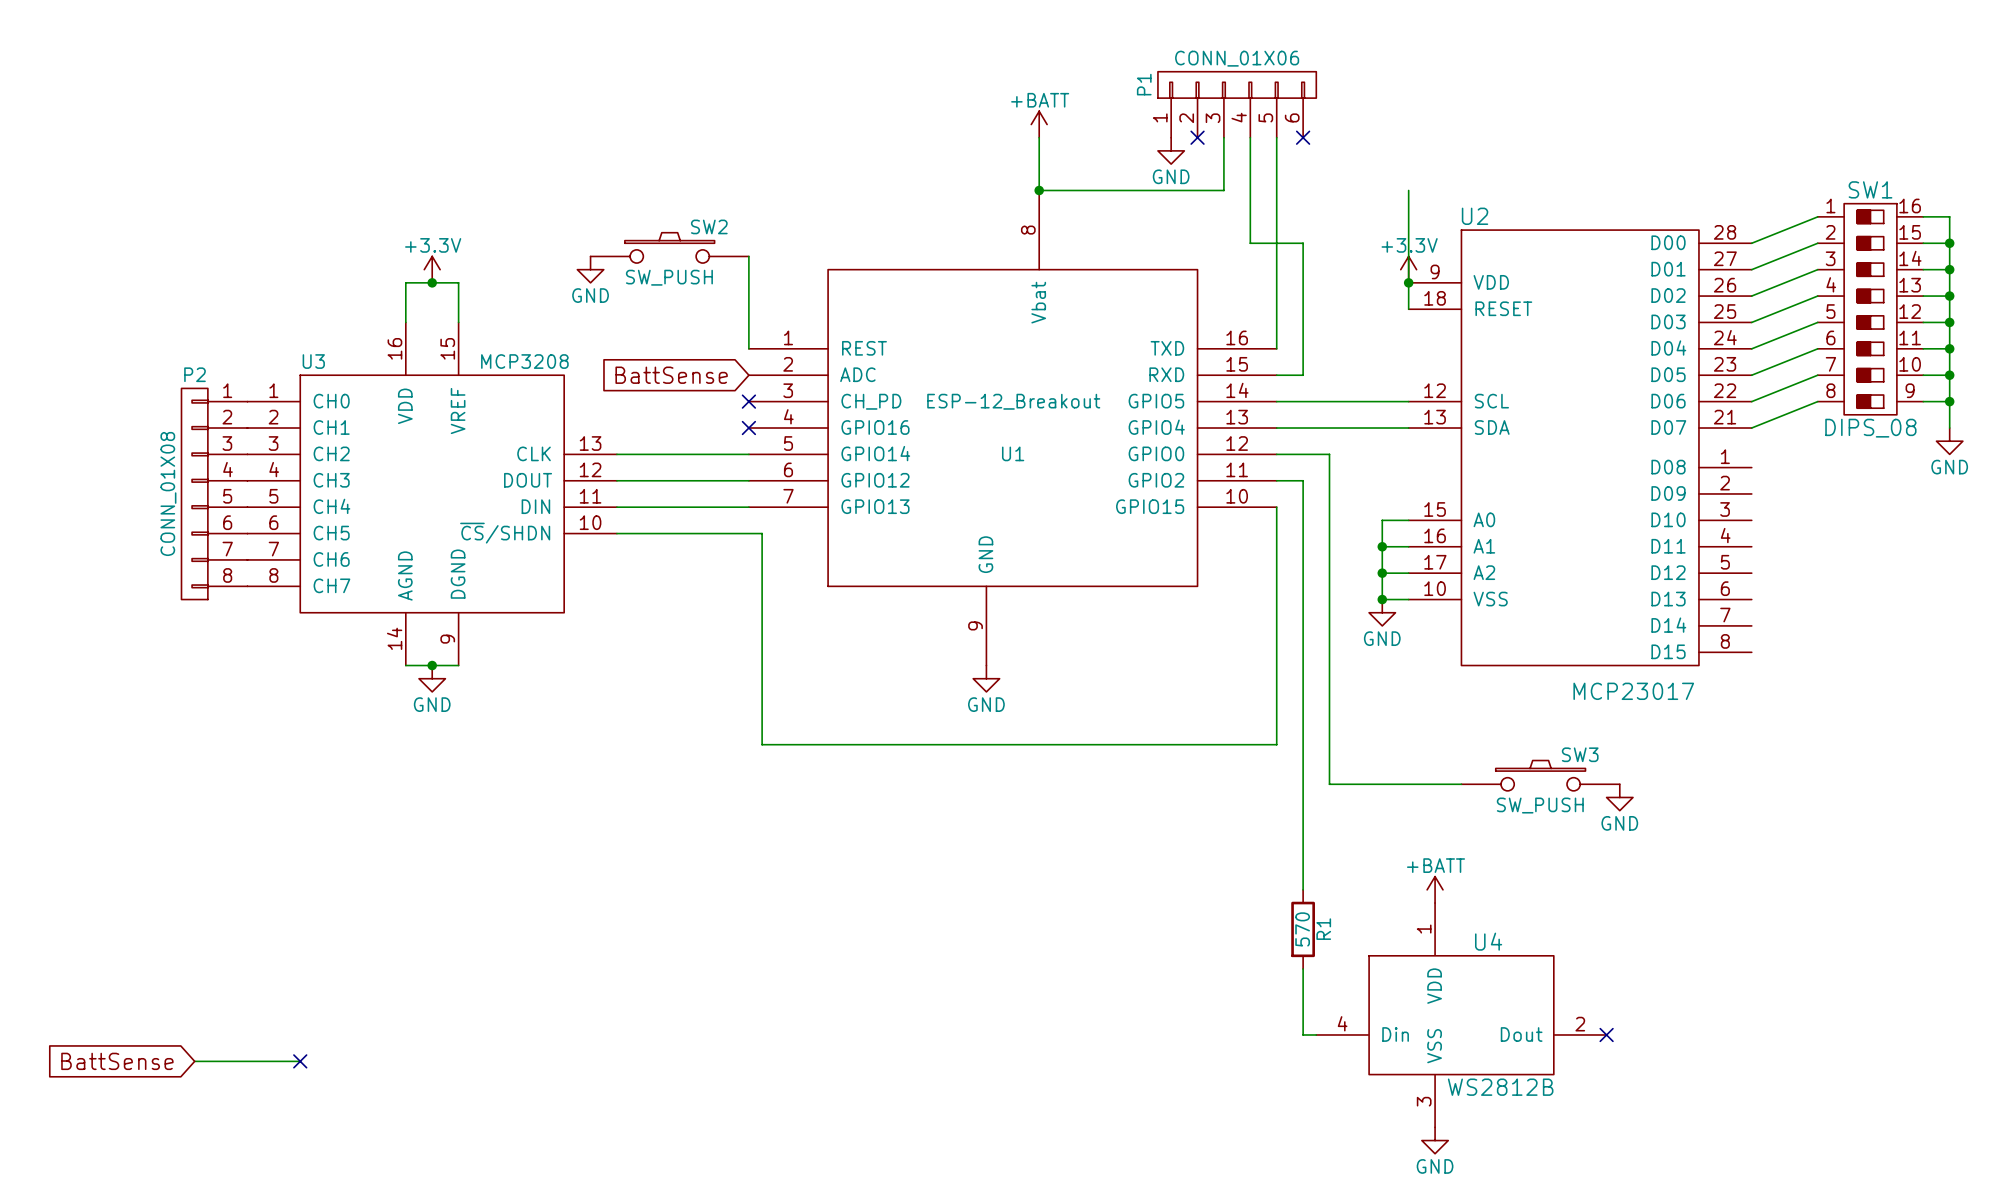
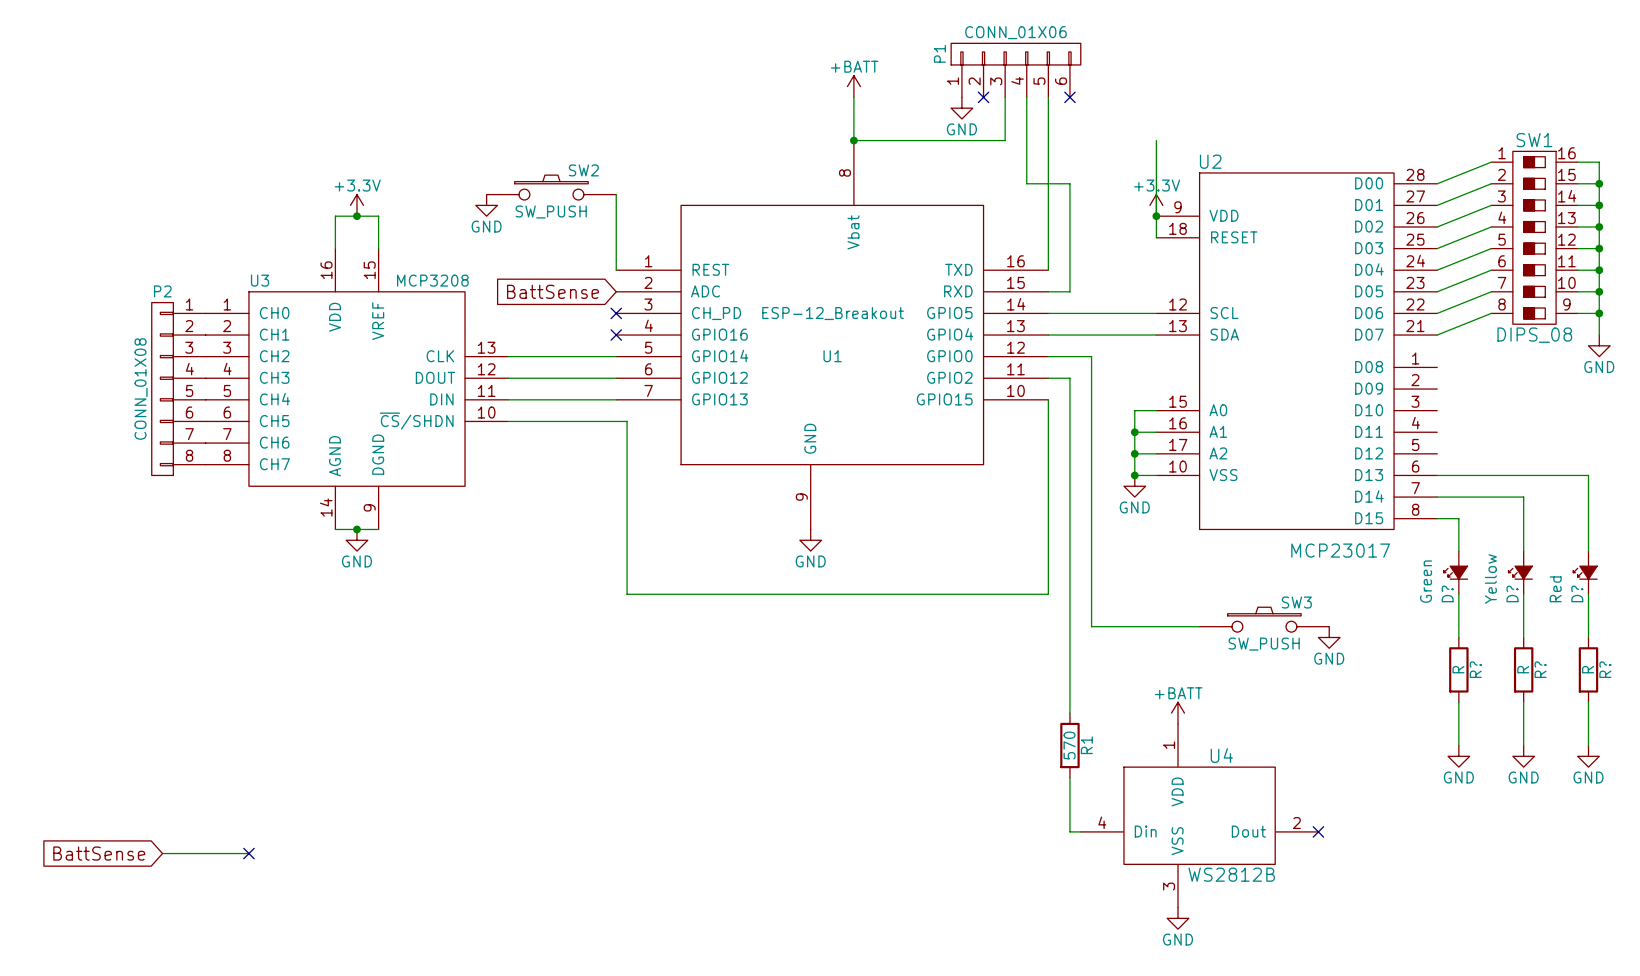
wire: none -> (1437, 475) (1588, 475) (1588, 551)
wire: none -> (1437, 497) (1523, 497) (1523, 551)
wire: none -> (1437, 518) (1458, 518) (1458, 551)
D?: none -> Green (1455, 572)
D?: none -> Yellow (1520, 572)
D?: none -> Red (1585, 572)
wire: none -> (1458, 594) (1458, 637)
wire: none -> (1523, 594) (1523, 637)
wire: none -> (1588, 594) (1588, 637)
R?: none -> R (1458, 669)
R?: none -> R (1523, 669)
R?: none -> R (1588, 669)
wire: none -> (1458, 702) (1458, 745)
wire: none -> (1523, 702) (1523, 745)
wire: none -> (1588, 702) (1588, 745)
power symbol: none -> GND (1458, 756)
power symbol: none -> GND (1523, 756)
power symbol: none -> GND (1588, 756)

